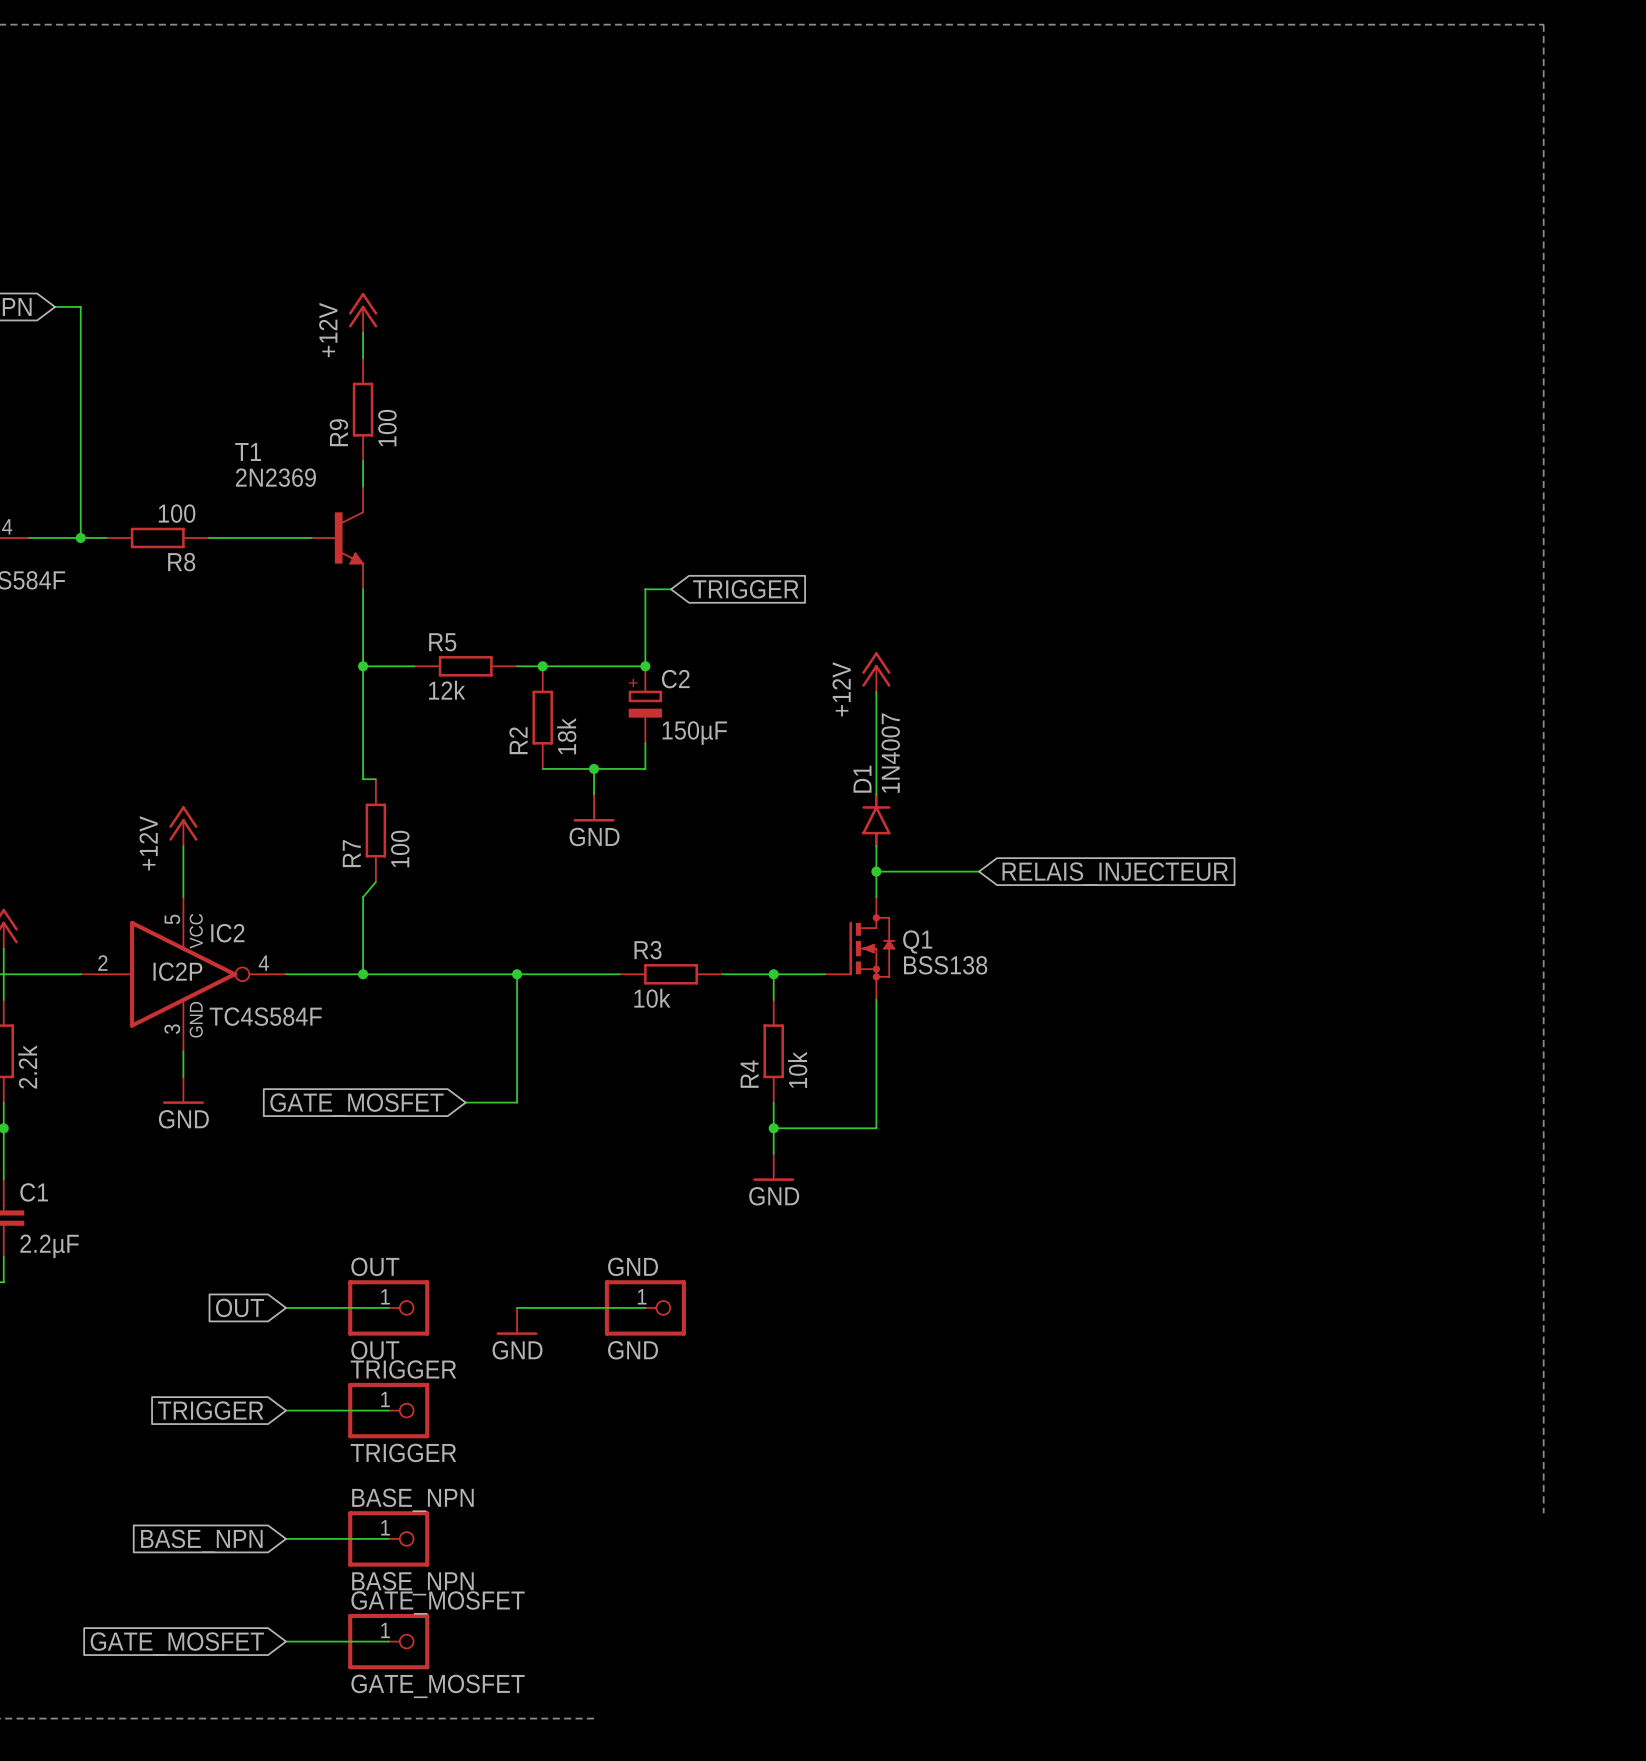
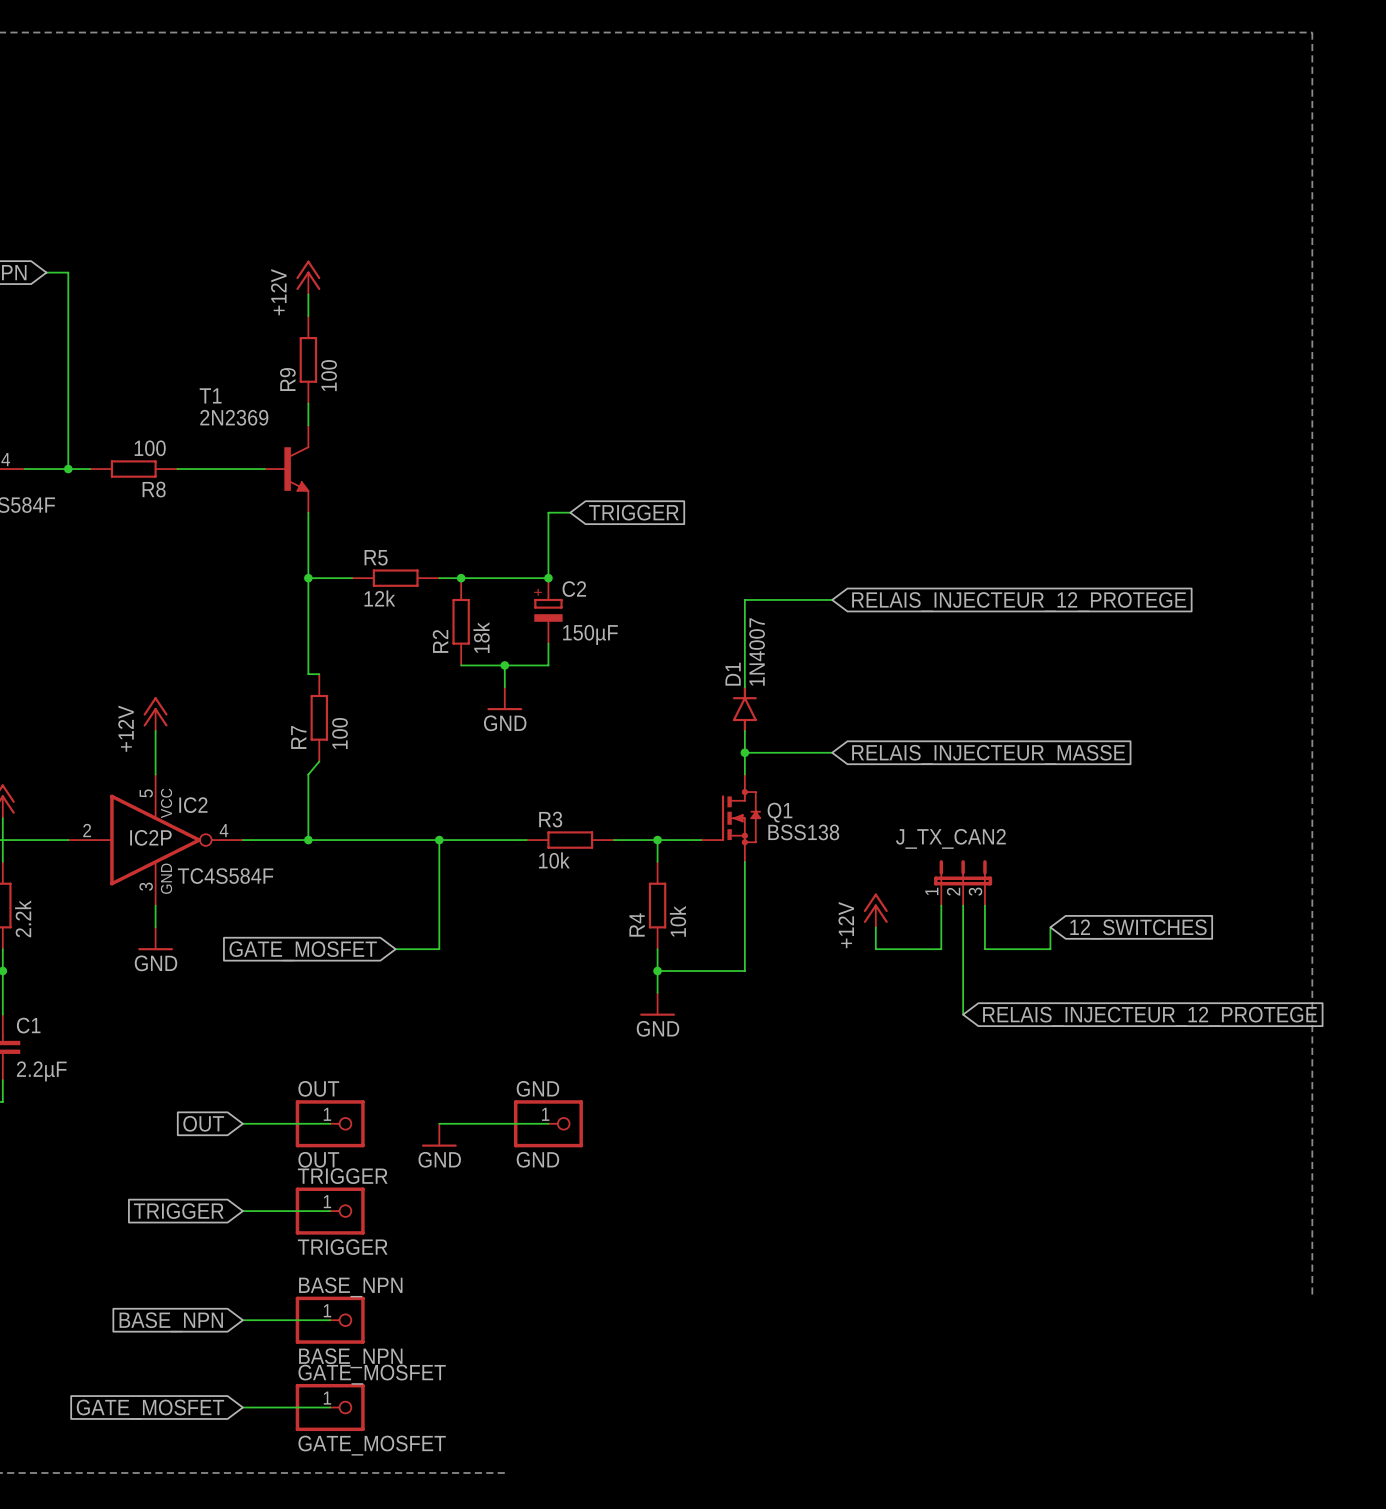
power symbol: +12V (876, 672) -> none
wire: none -> (744, 599) (832, 599)
global label: none -> RELAIS_INJECTEUR_12_PROTEGE (1019, 602)
global label: RELAIS_INJECTEUR (1115, 874) -> RELAIS_INJECTEUR_MASSE (988, 754)
J_TX_CAN2: none -> (963, 882)
wire: none -> (941, 905) (941, 949) (875, 949) (875, 927)
wire: none -> (963, 905) (963, 1014)
wire: none -> (984, 905) (984, 949) (1050, 949) (1050, 927)
power symbol: none -> +12V (875, 910)
global label: none -> 12_SWITCHES (1138, 929)
global label: none -> RELAIS_INJECTEUR_12_PROTEGE (1150, 1016)

